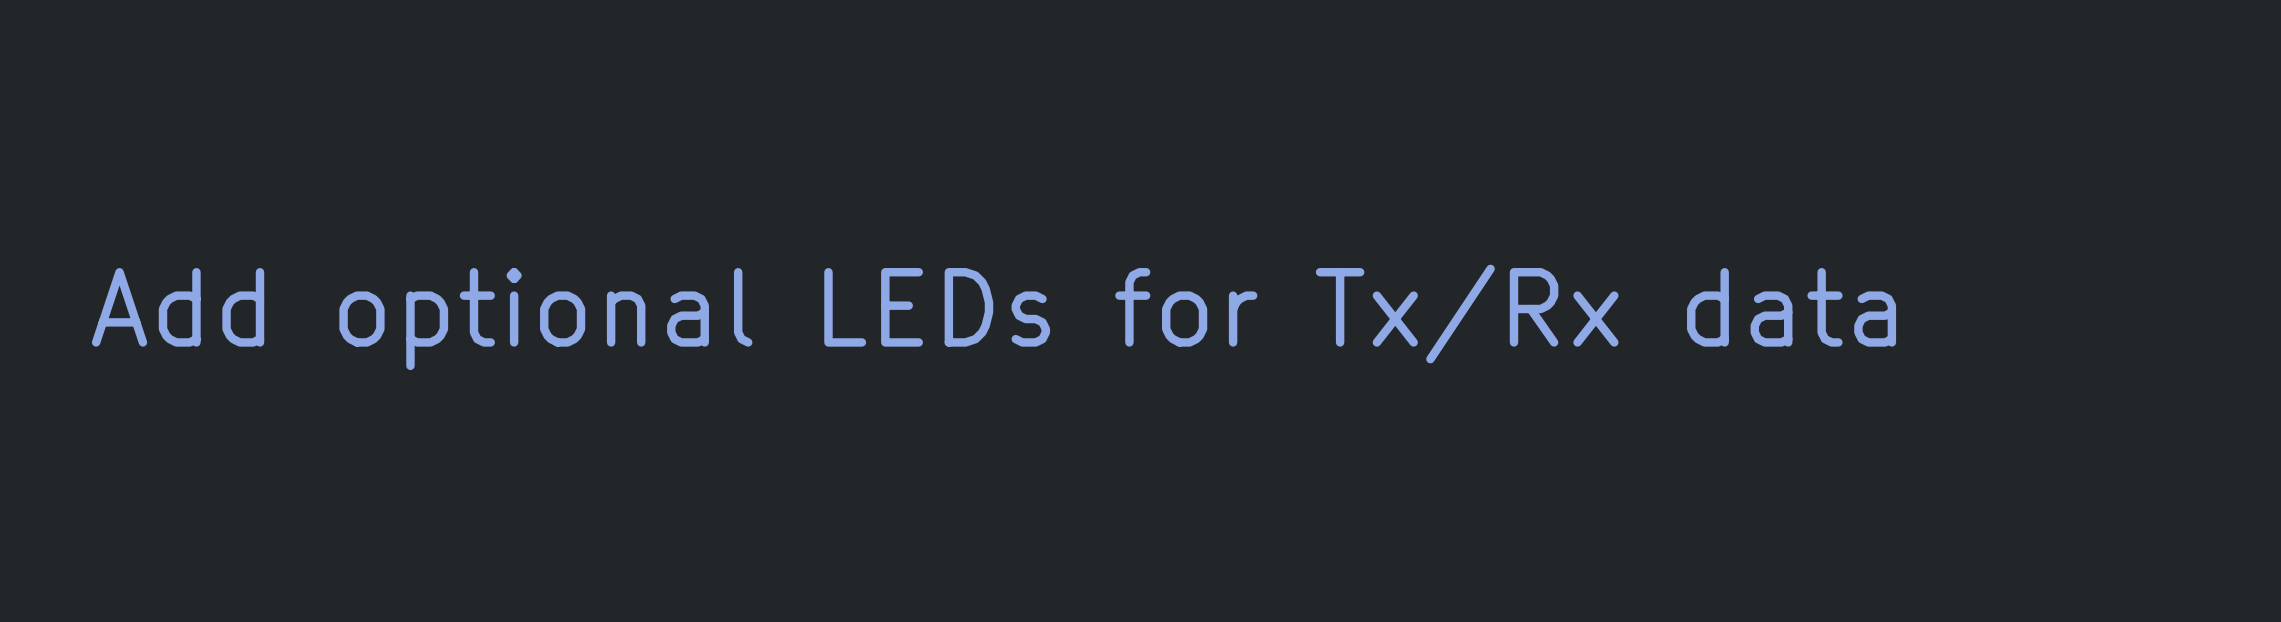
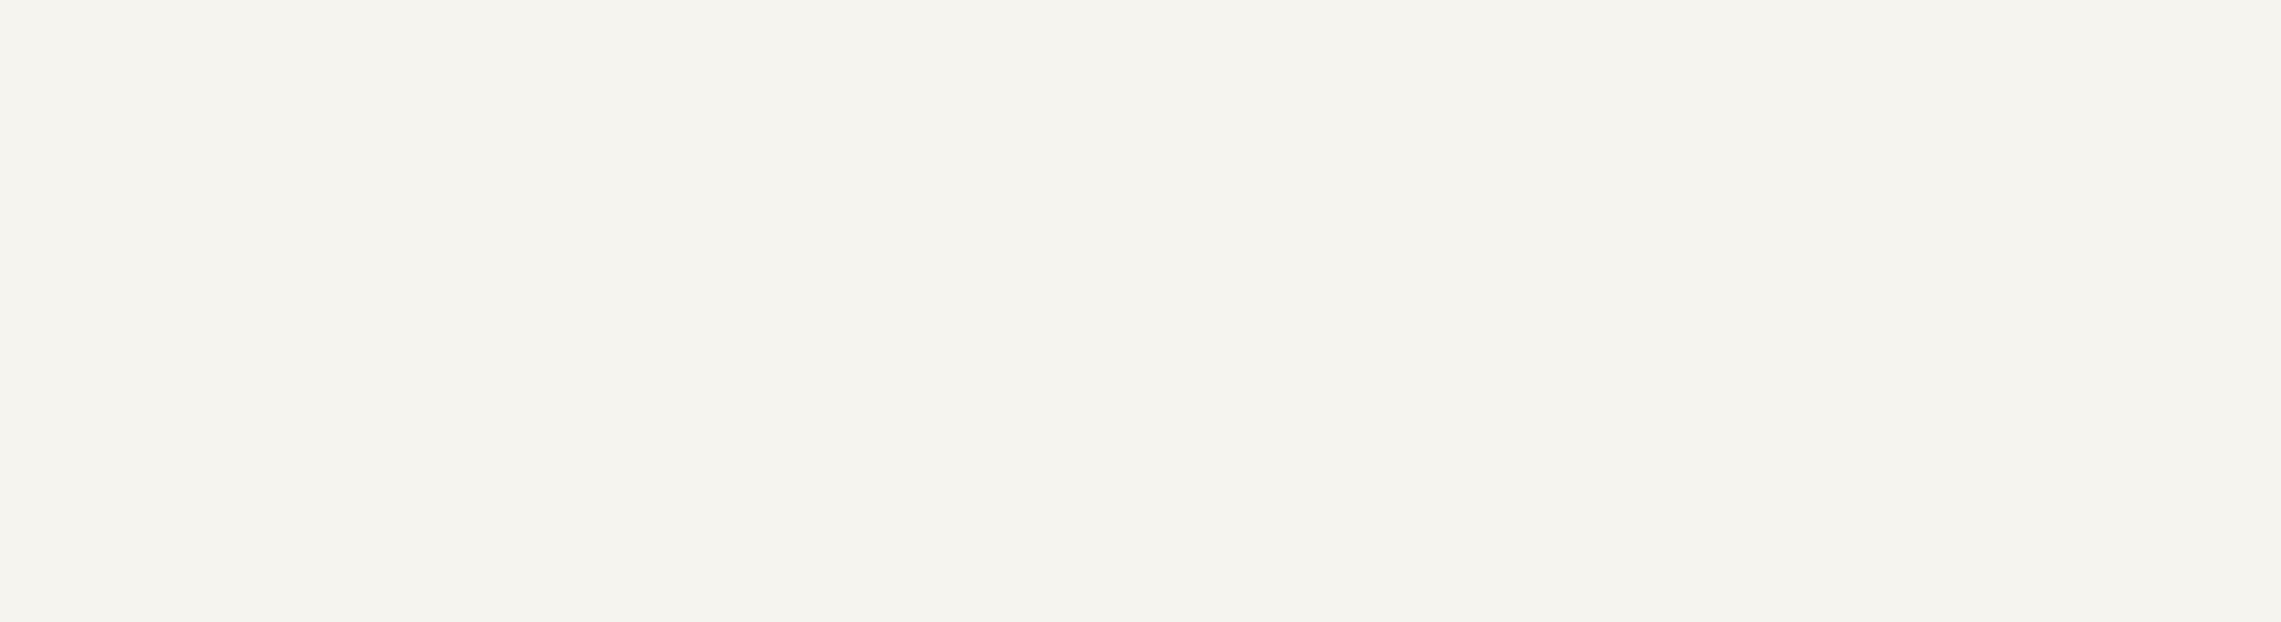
text: Add optional LEDs for Tx/Rx data (994, 317) -> none

